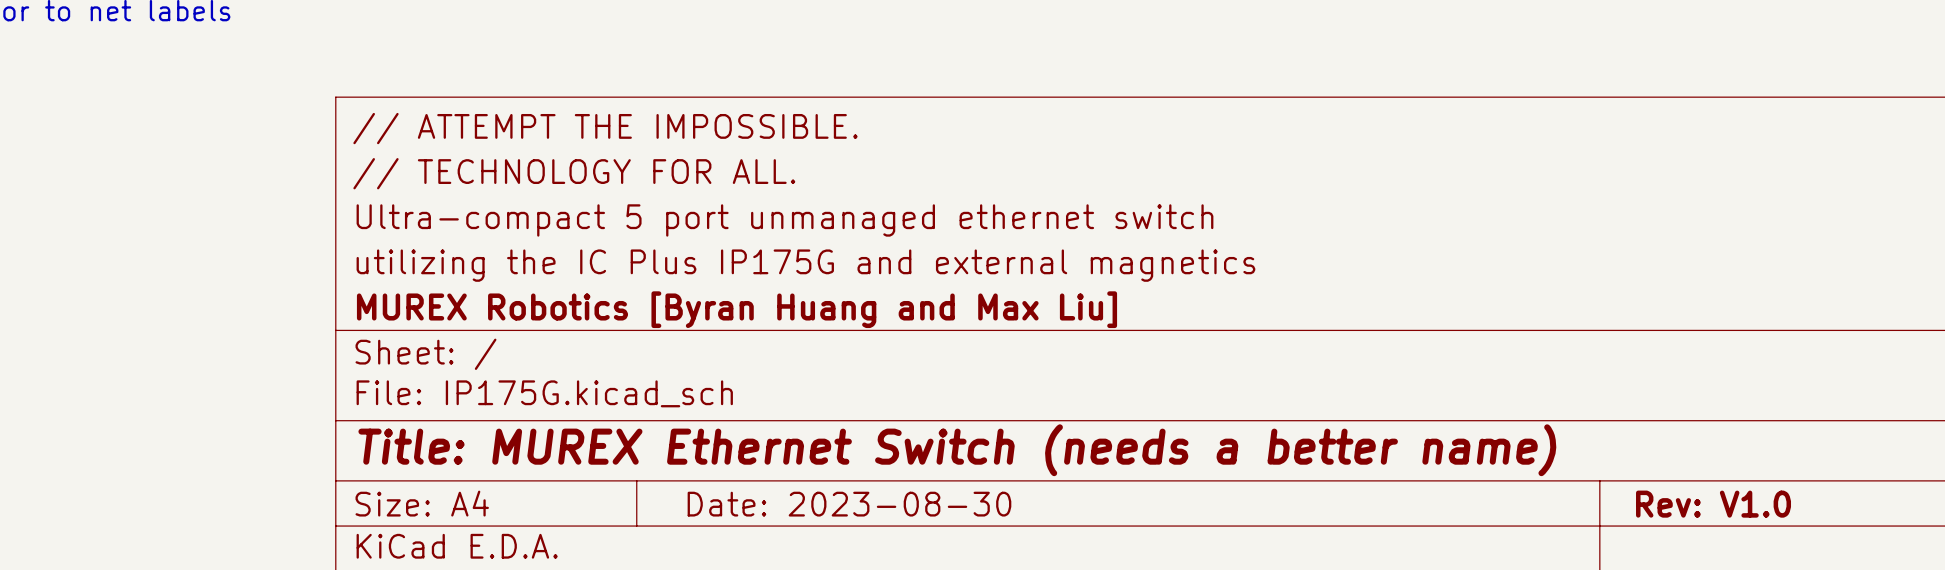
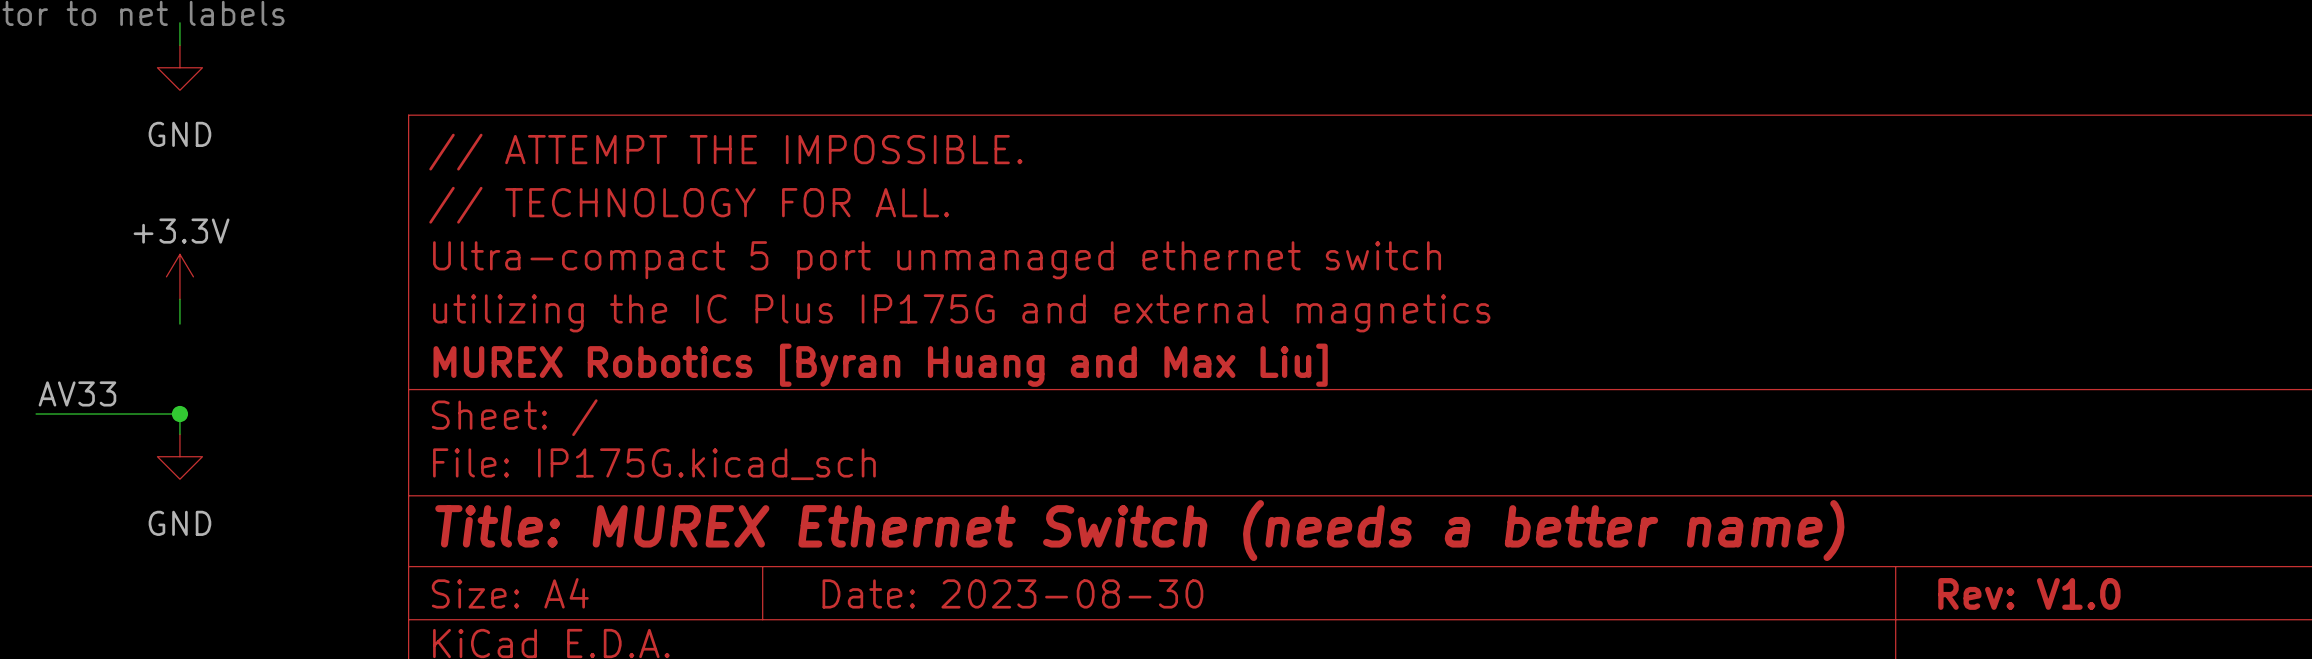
wire: none -> (179, 22) (179, 45)
power symbol: none -> GND (179, 67)
power symbol: none -> +3.3V (179, 276)
wire: none -> (179, 299) (179, 324)
label: none -> AV33 (77, 393)
wire: none -> (36, 414) (179, 414) (179, 434)
junction: none -> (179, 414)
power symbol: none -> GND (179, 456)

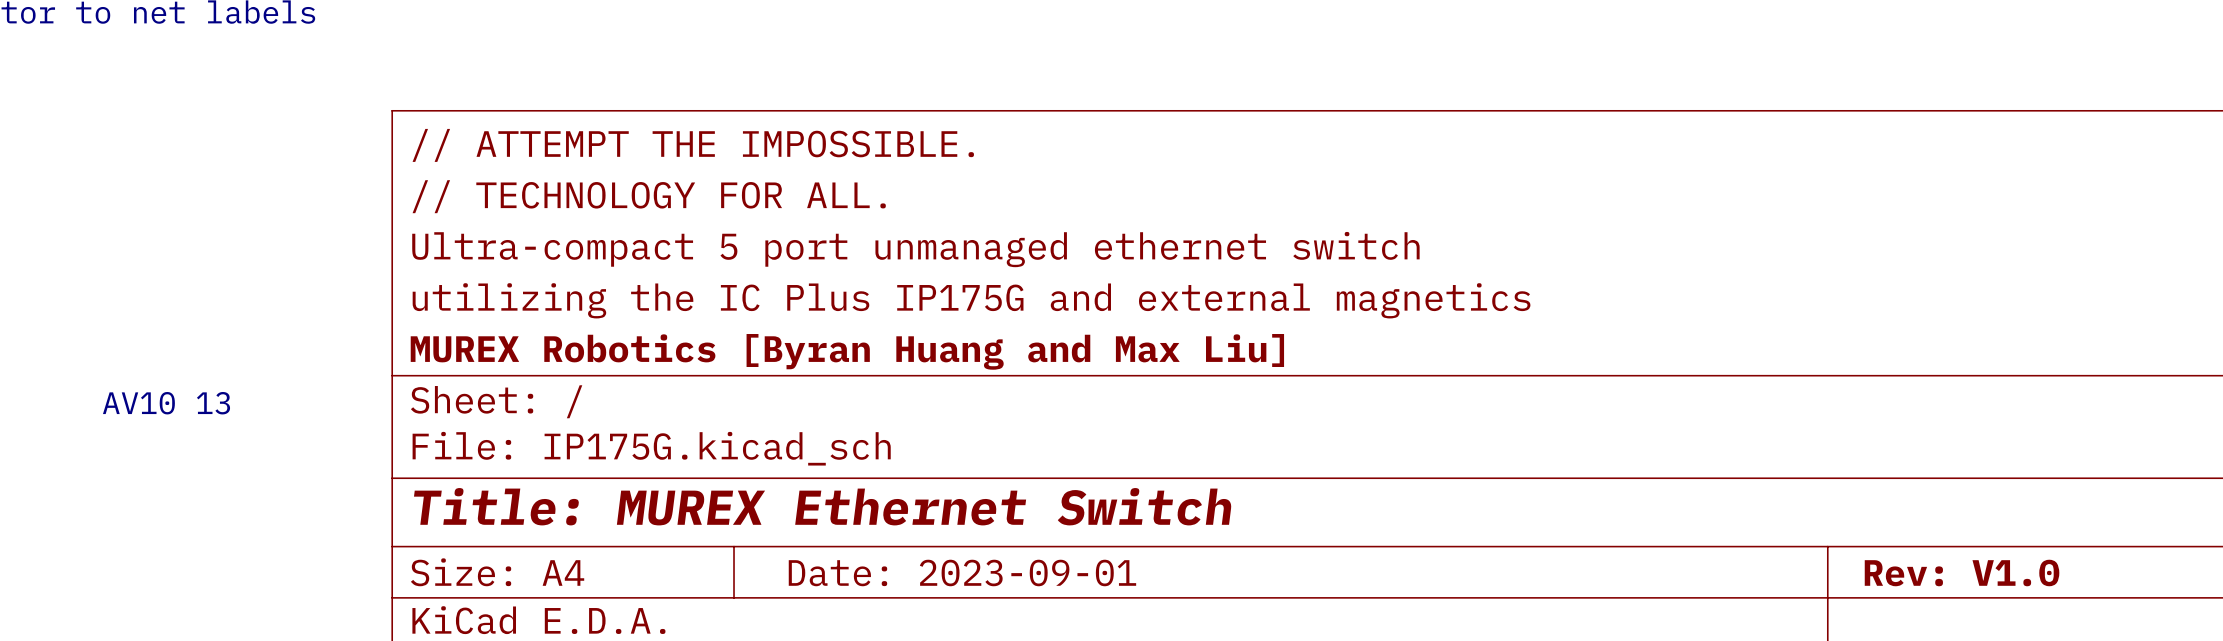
wire: (179, 22) (179, 45) -> none
power symbol: GND (179, 67) -> none
power symbol: +3.3V (179, 276) -> none
wire: (179, 299) (179, 324) -> none
label: AV33 (77, 393) -> none
wire: (36, 414) (179, 414) (179, 434) -> none
junction: (179, 414) -> none
text: none -> AV10 13 (166, 403)
power symbol: GND (179, 456) -> none
title block: Title: MUREX Ethernet Switch (needs a better name) (1139, 530) -> Title: MUREX Ethernet Switch (822, 506)
title block: Date: 2023-08-30 (1012, 593) -> Date: 2023-09-01 (962, 572)

